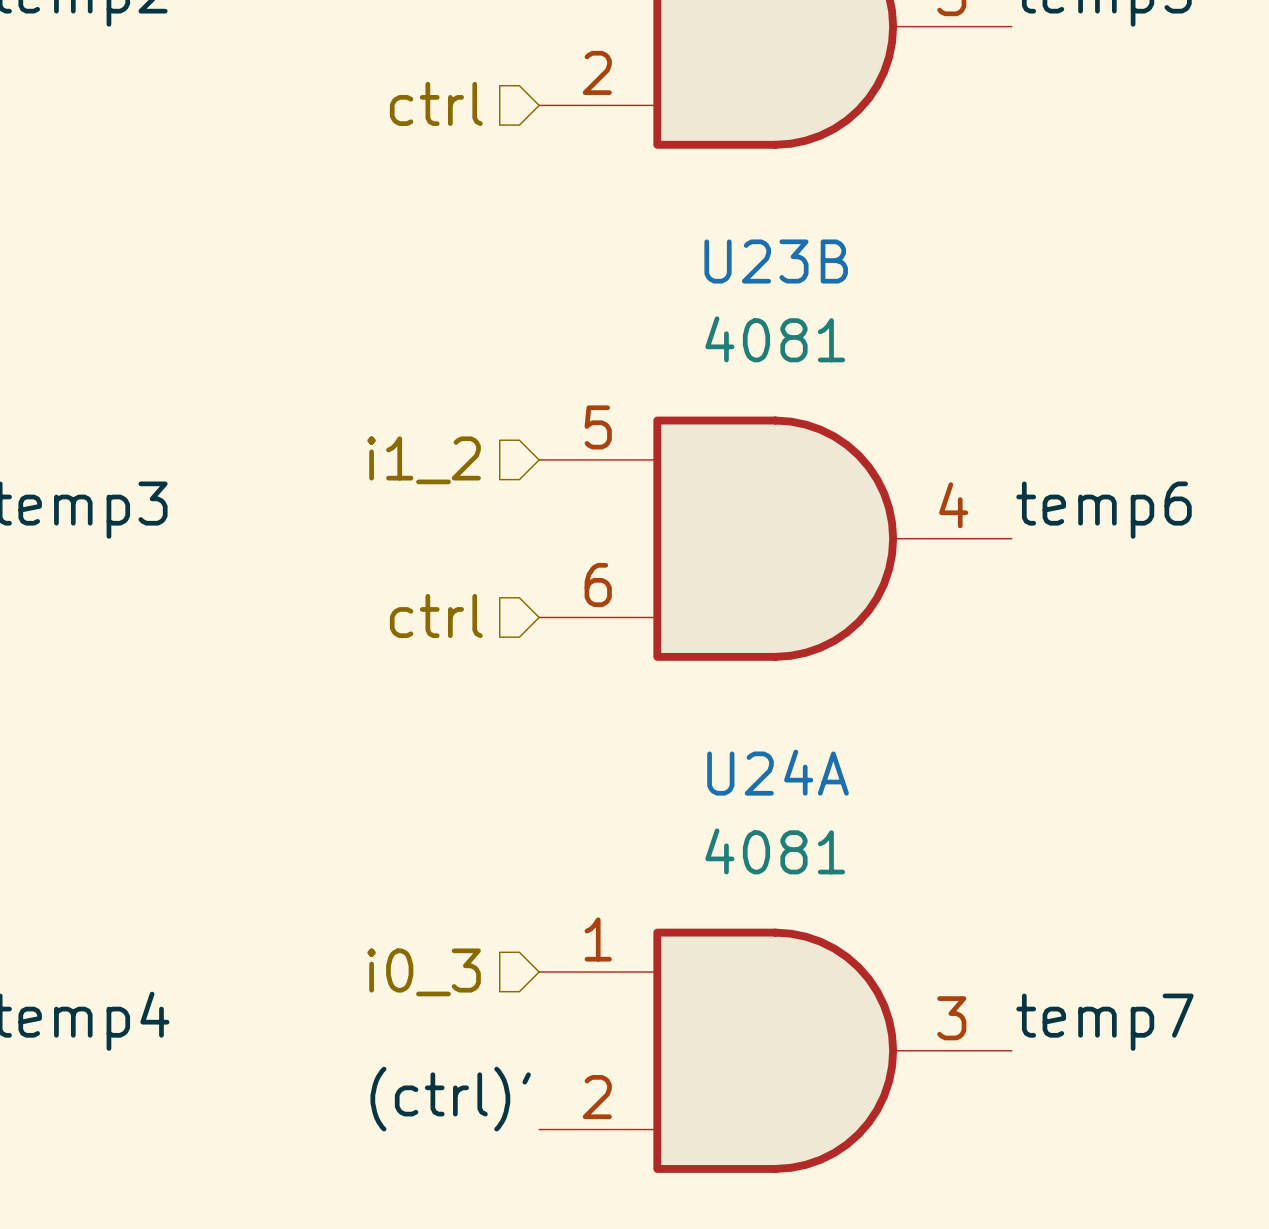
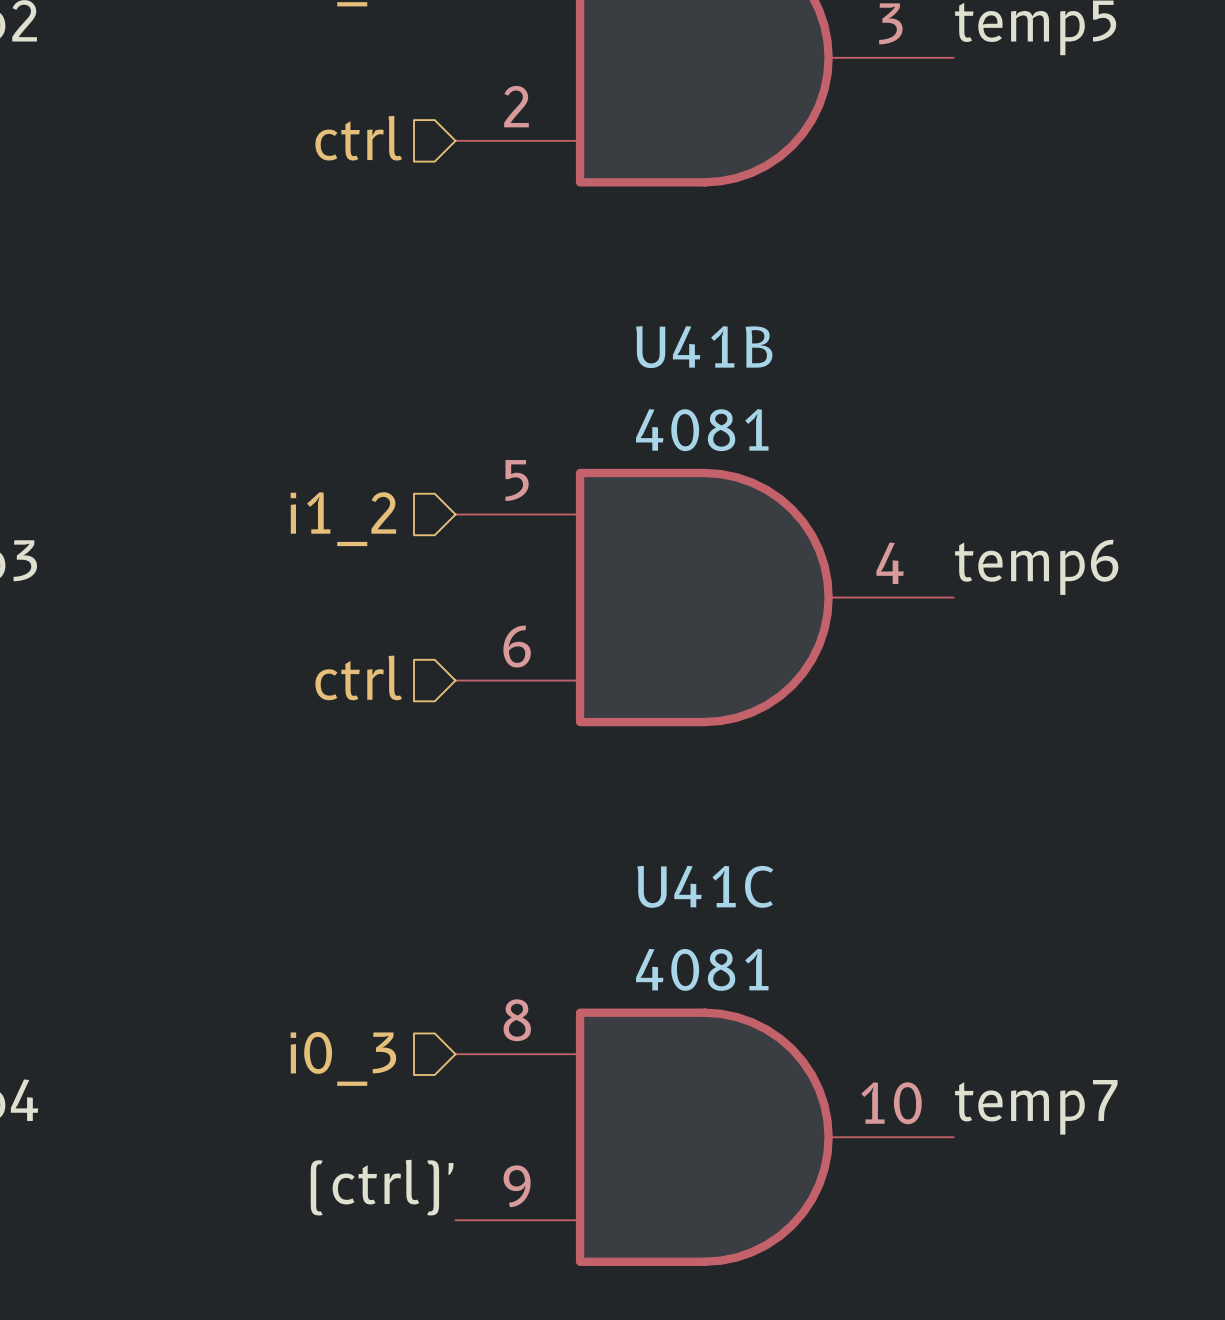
U23B name: U23B (776, 261) -> U41B (704, 347)
U23B value position: 4081 (775, 339) -> 4081 (702, 430)
U24A name: U24A (778, 772) -> U41C (705, 886)
U24A value position: 4081 (775, 851) -> 4081 (702, 969)
U24A pin number: 1 (598, 939) -> 8 (517, 1020)
U24A pin number: 3 (951, 1018) -> 10 (891, 1103)
U24A pin number: 2 (597, 1097) -> 9 (517, 1186)

